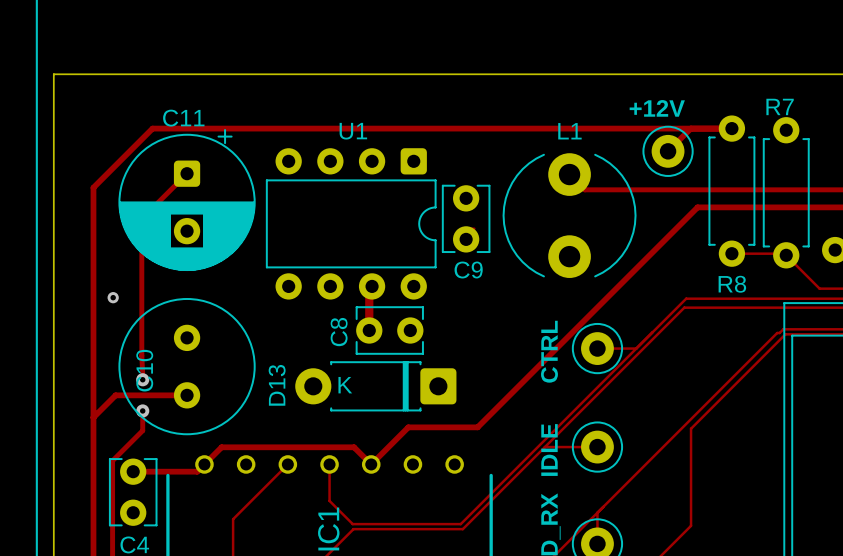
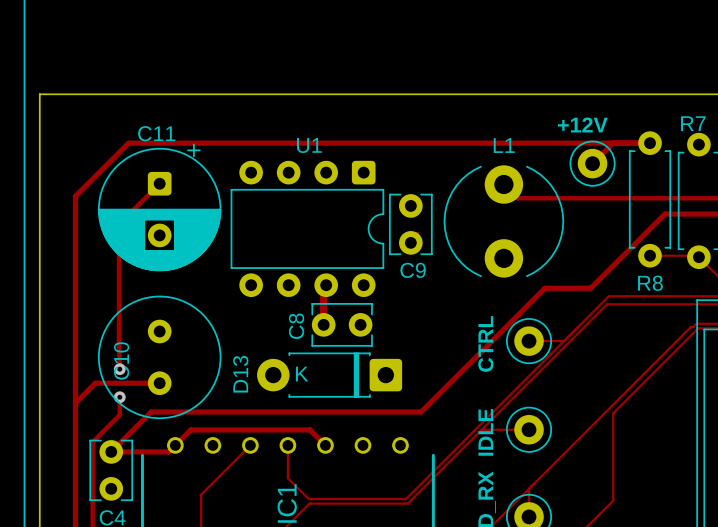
track: (748, 207) (697, 207) (615, 289) -> (664, 214) (590, 288) (544, 288)
via: (113, 297) -> none
track: (408, 427) (371, 464) -> (358, 412) (151, 412) (111, 451)

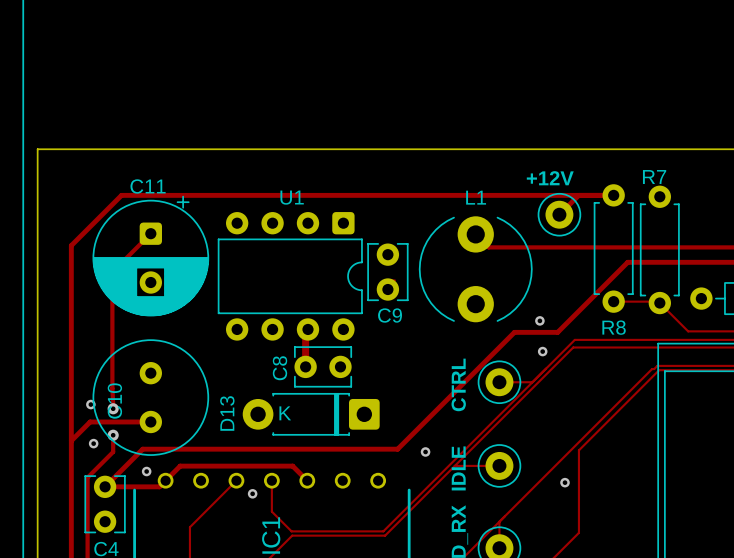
via: none -> (539, 320)
via: none -> (542, 351)
via: none -> (90, 404)
via: none -> (93, 443)
via: none -> (425, 451)
via: none -> (146, 471)
via: none -> (565, 482)
via: none -> (252, 493)

